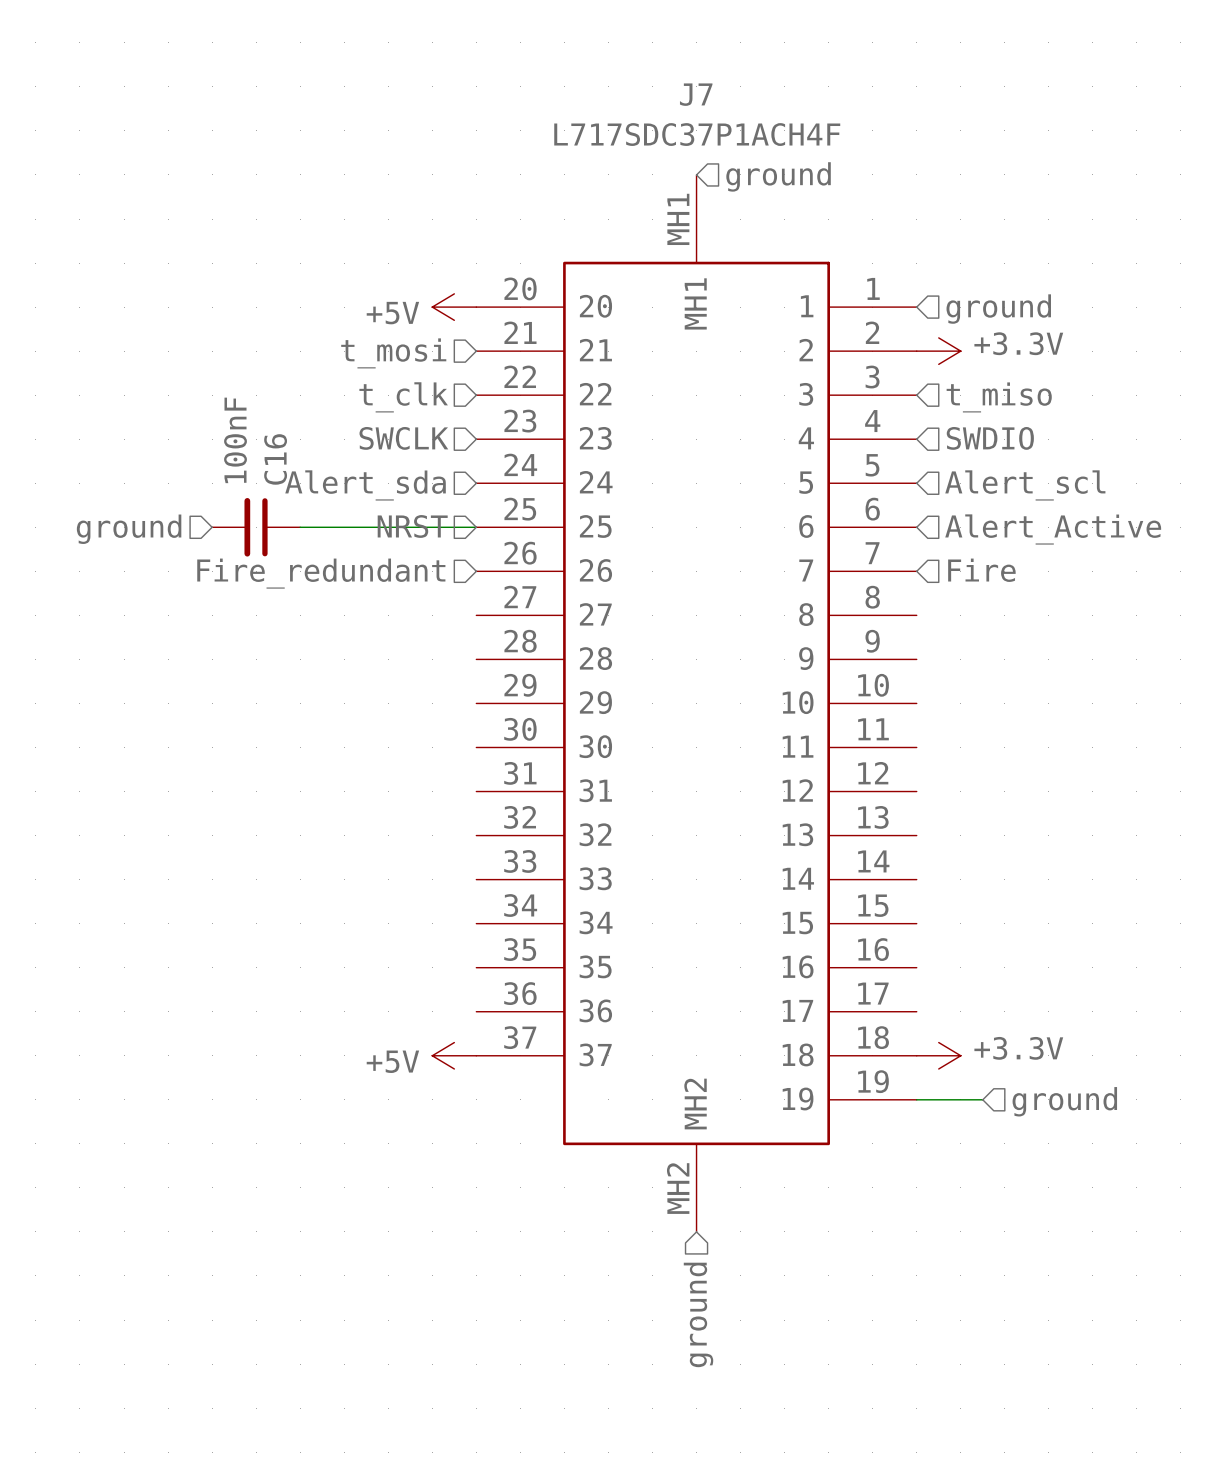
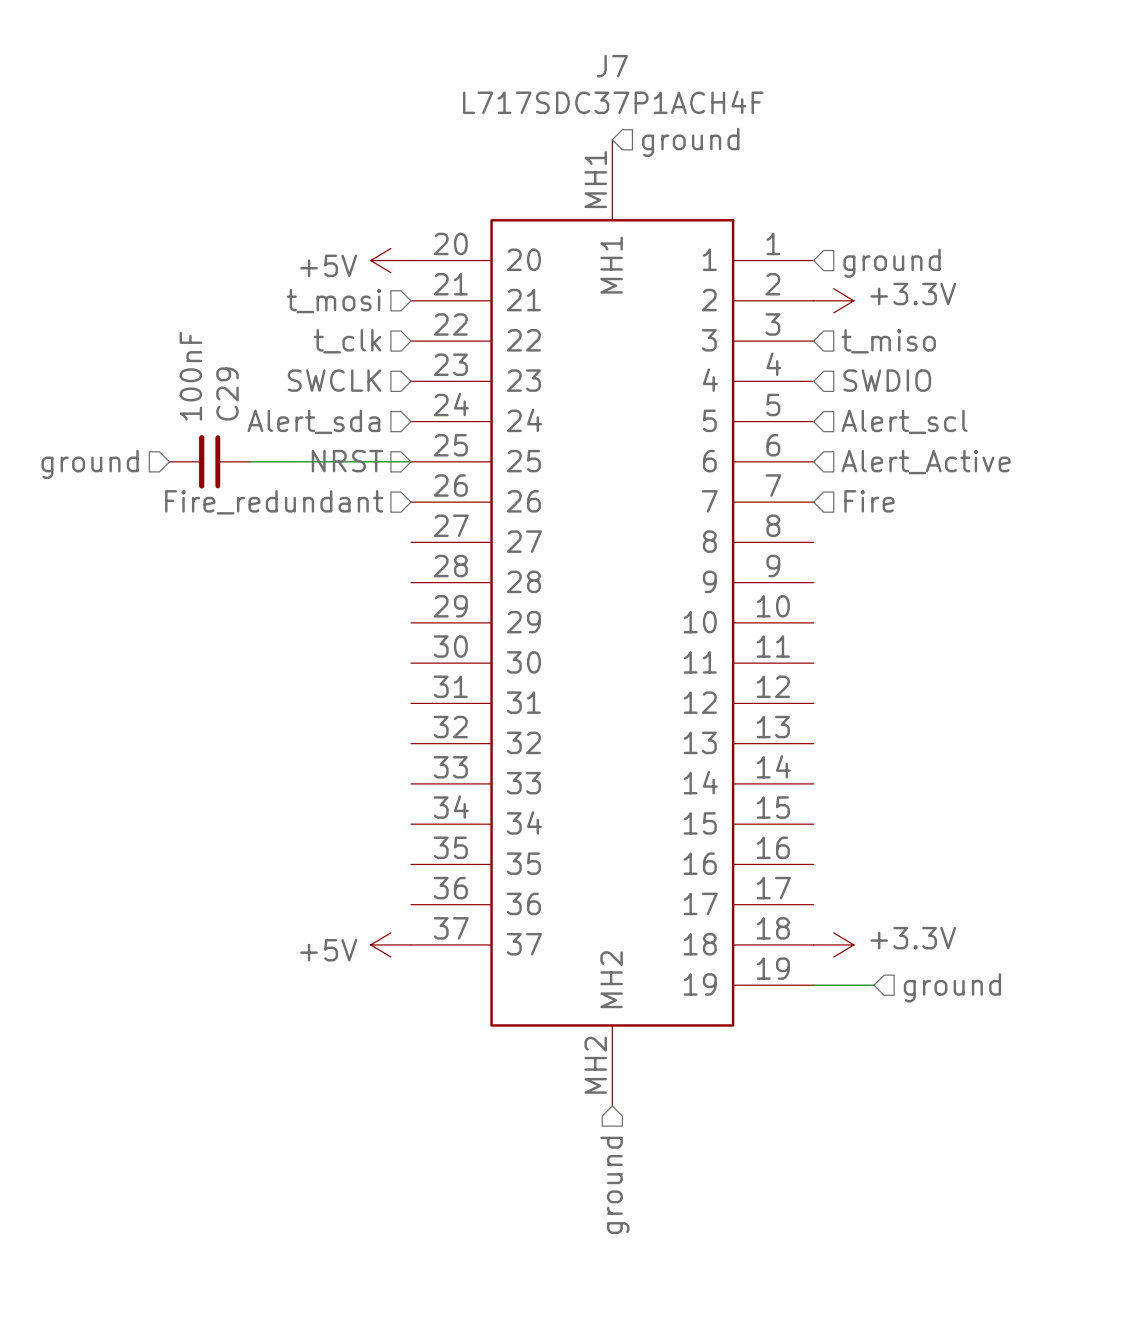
C16 name: C16 (275, 459) -> C29 (227, 393)

